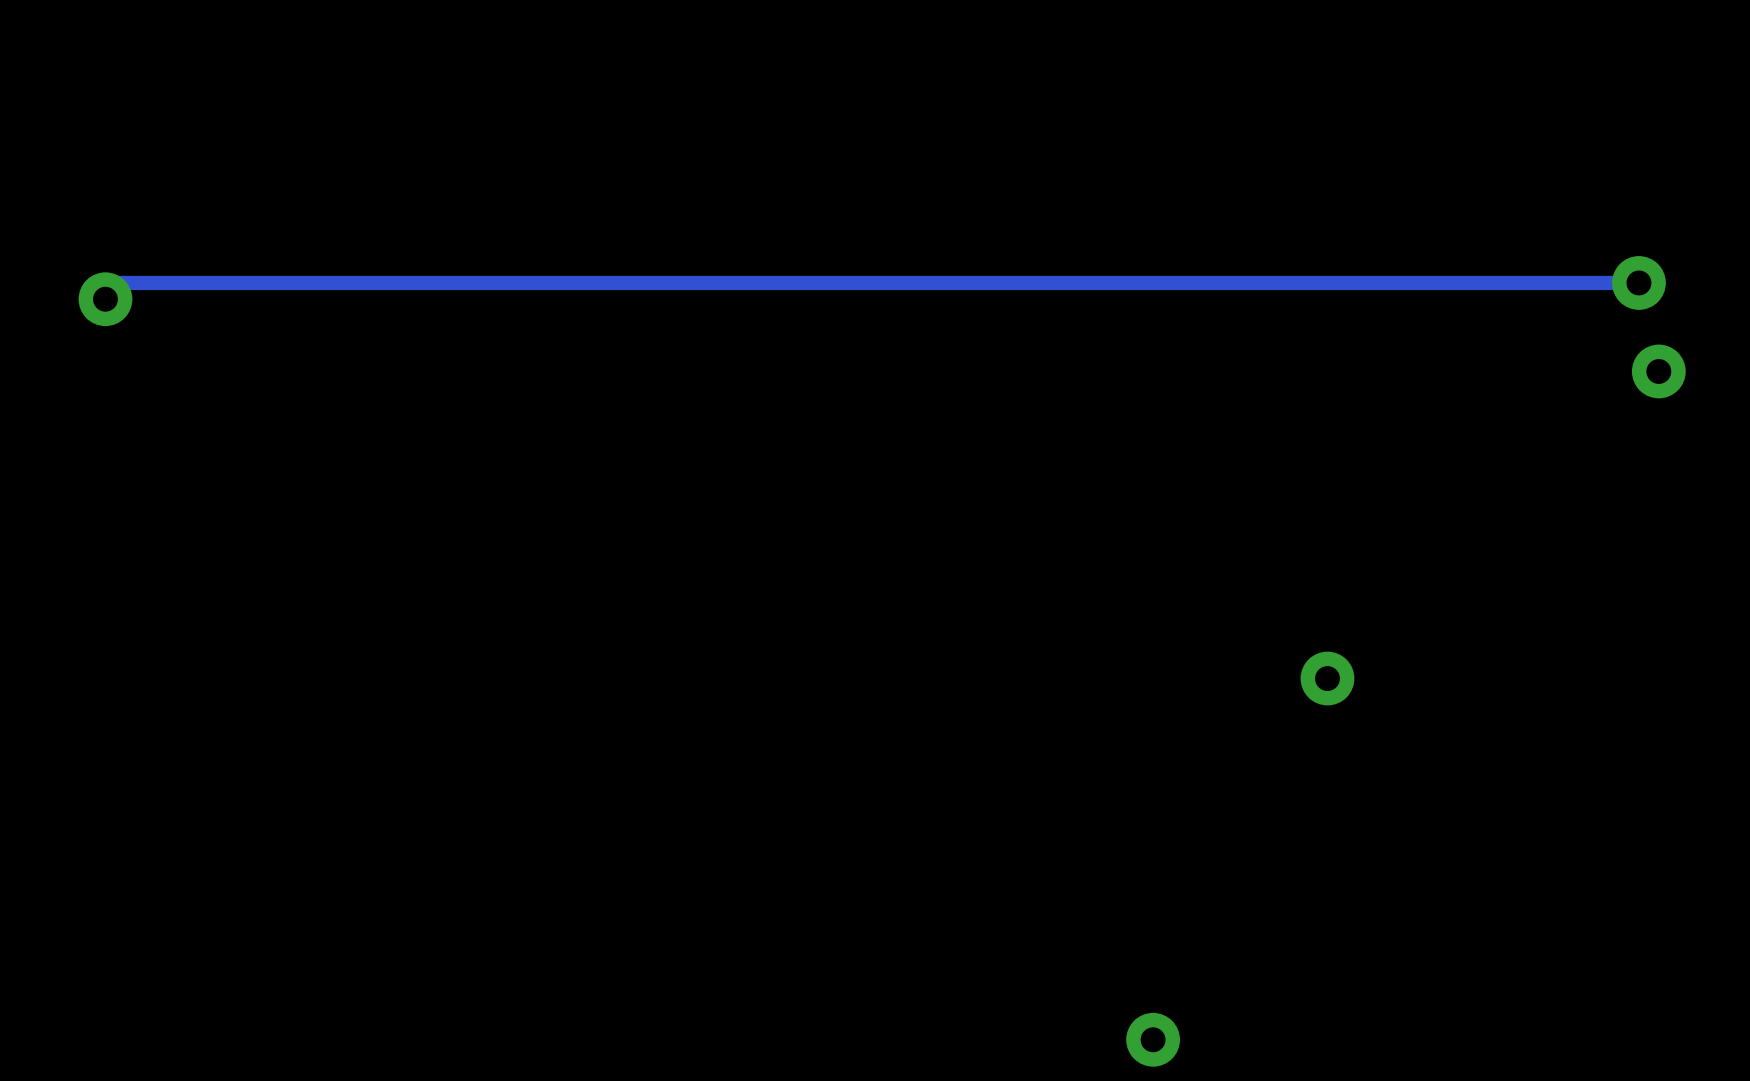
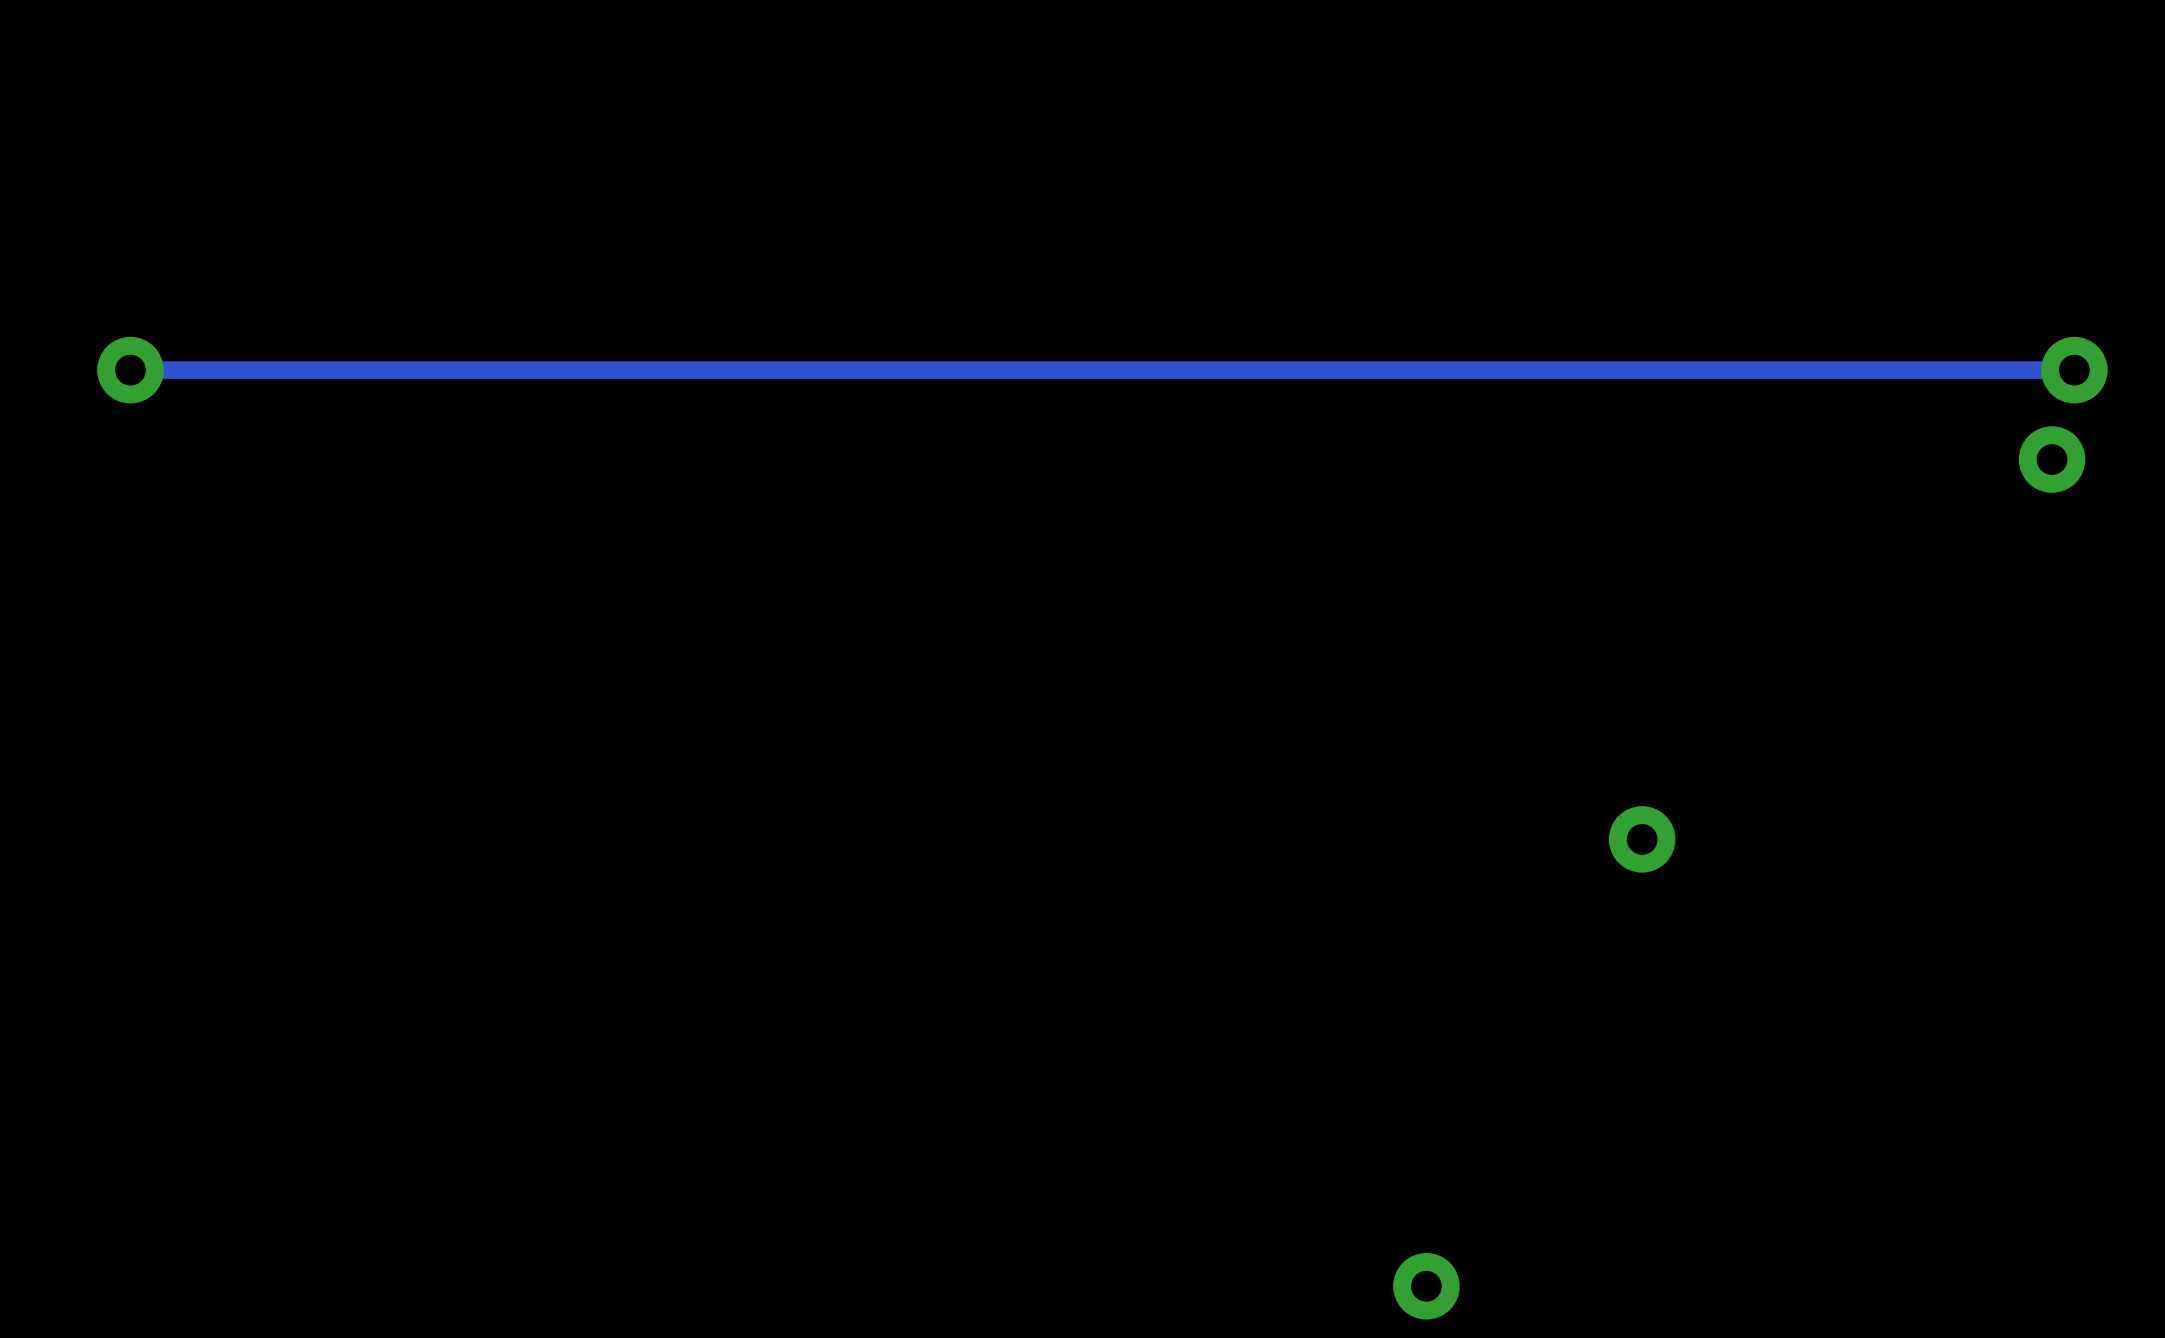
track: (1638, 282) (121, 282) (105, 299) -> (2074, 370) (130, 370)
via position: (1638, 282) -> (2074, 370)

